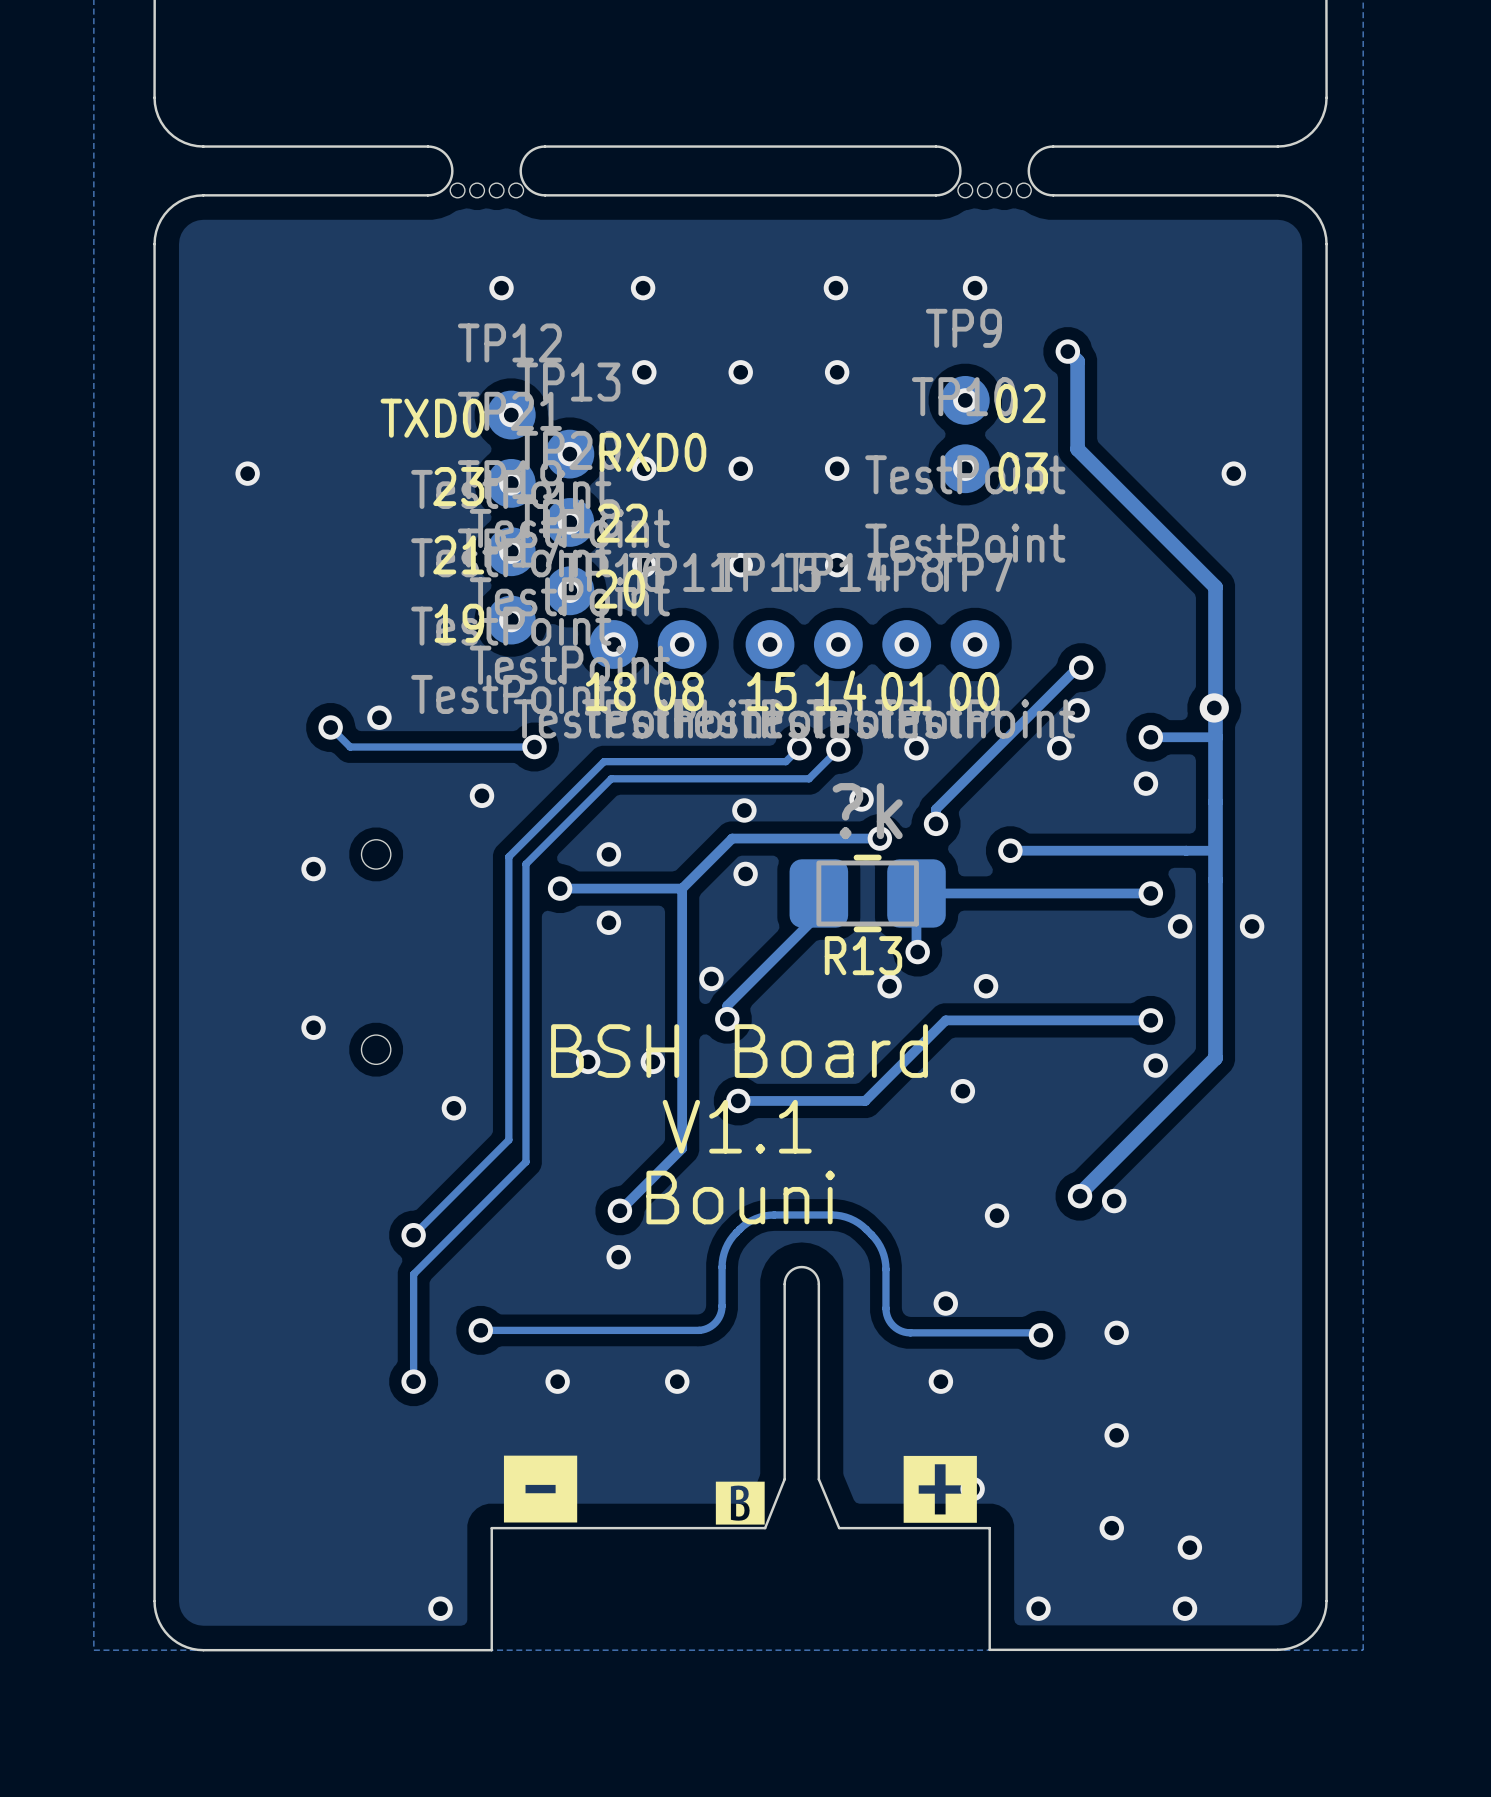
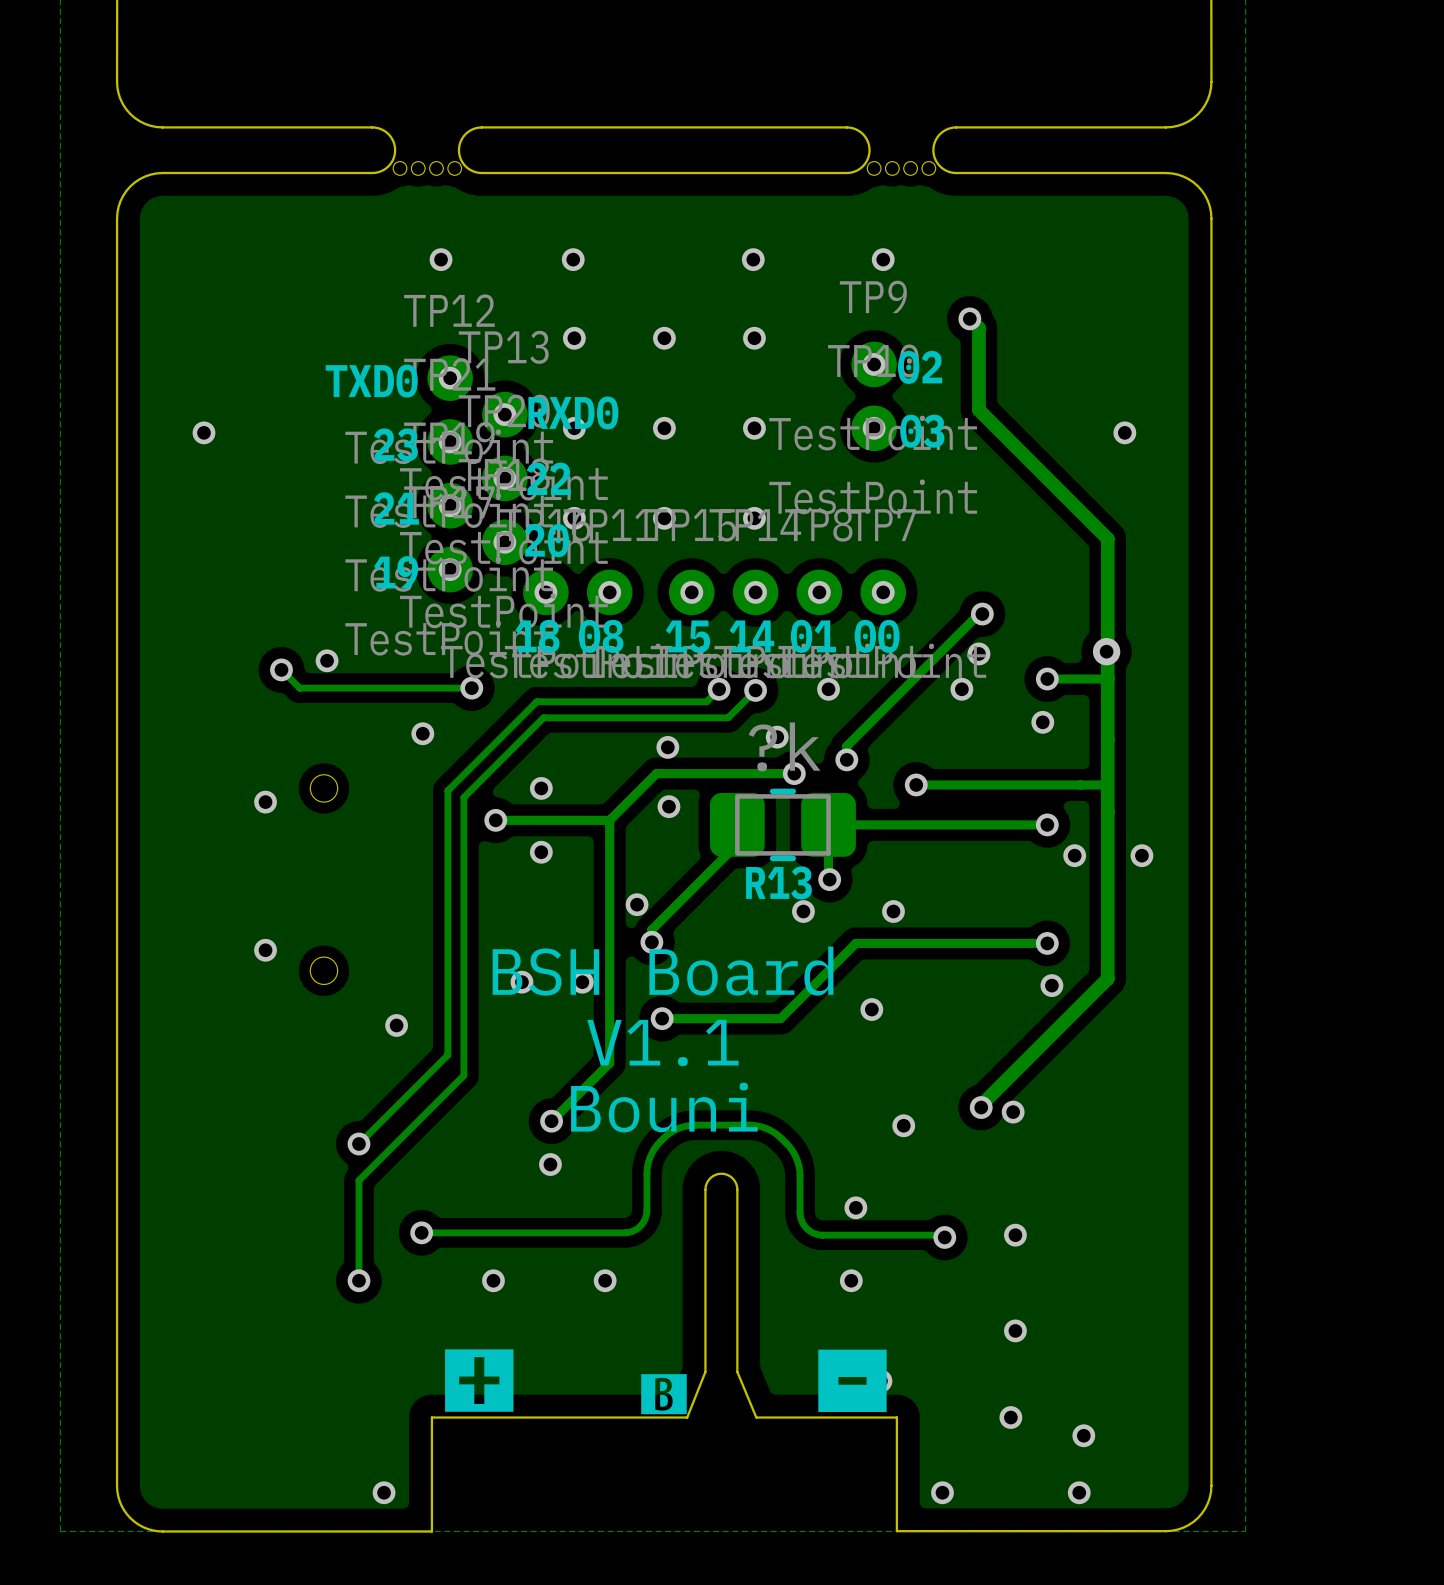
drawing shape: [503, 1455, 578, 1523] -> [445, 1349, 514, 1412]
drawing shape: [903, 1455, 977, 1523] -> [818, 1349, 887, 1413]

